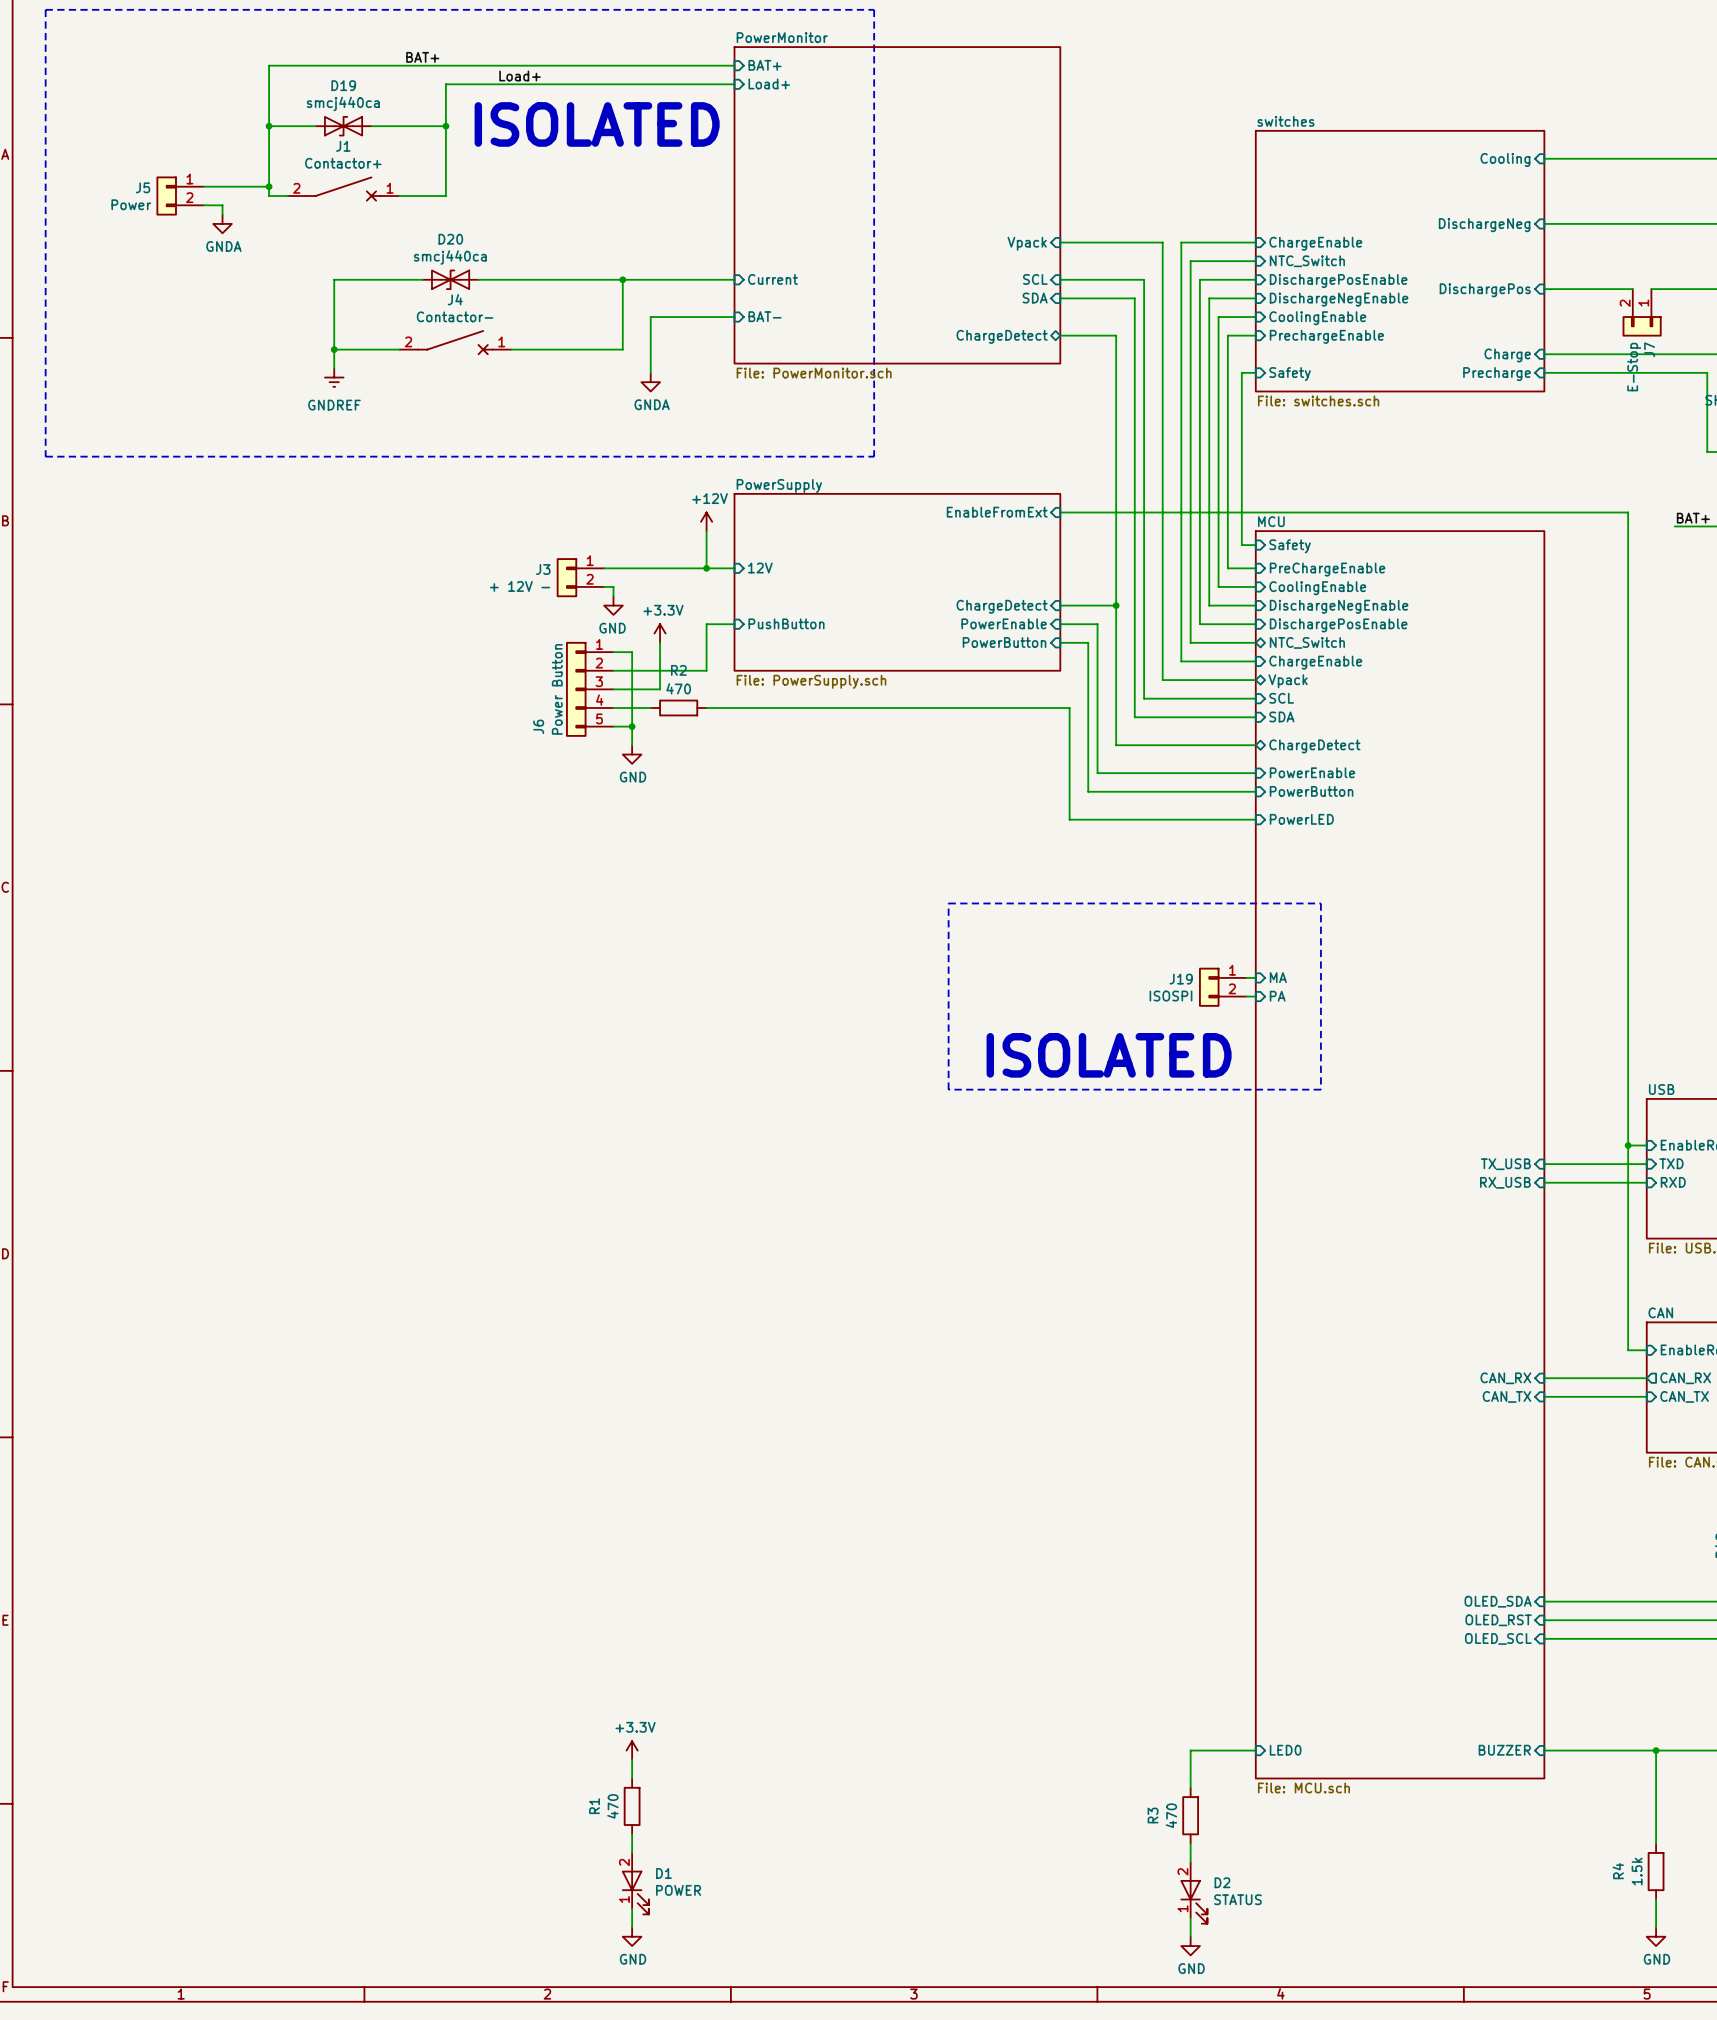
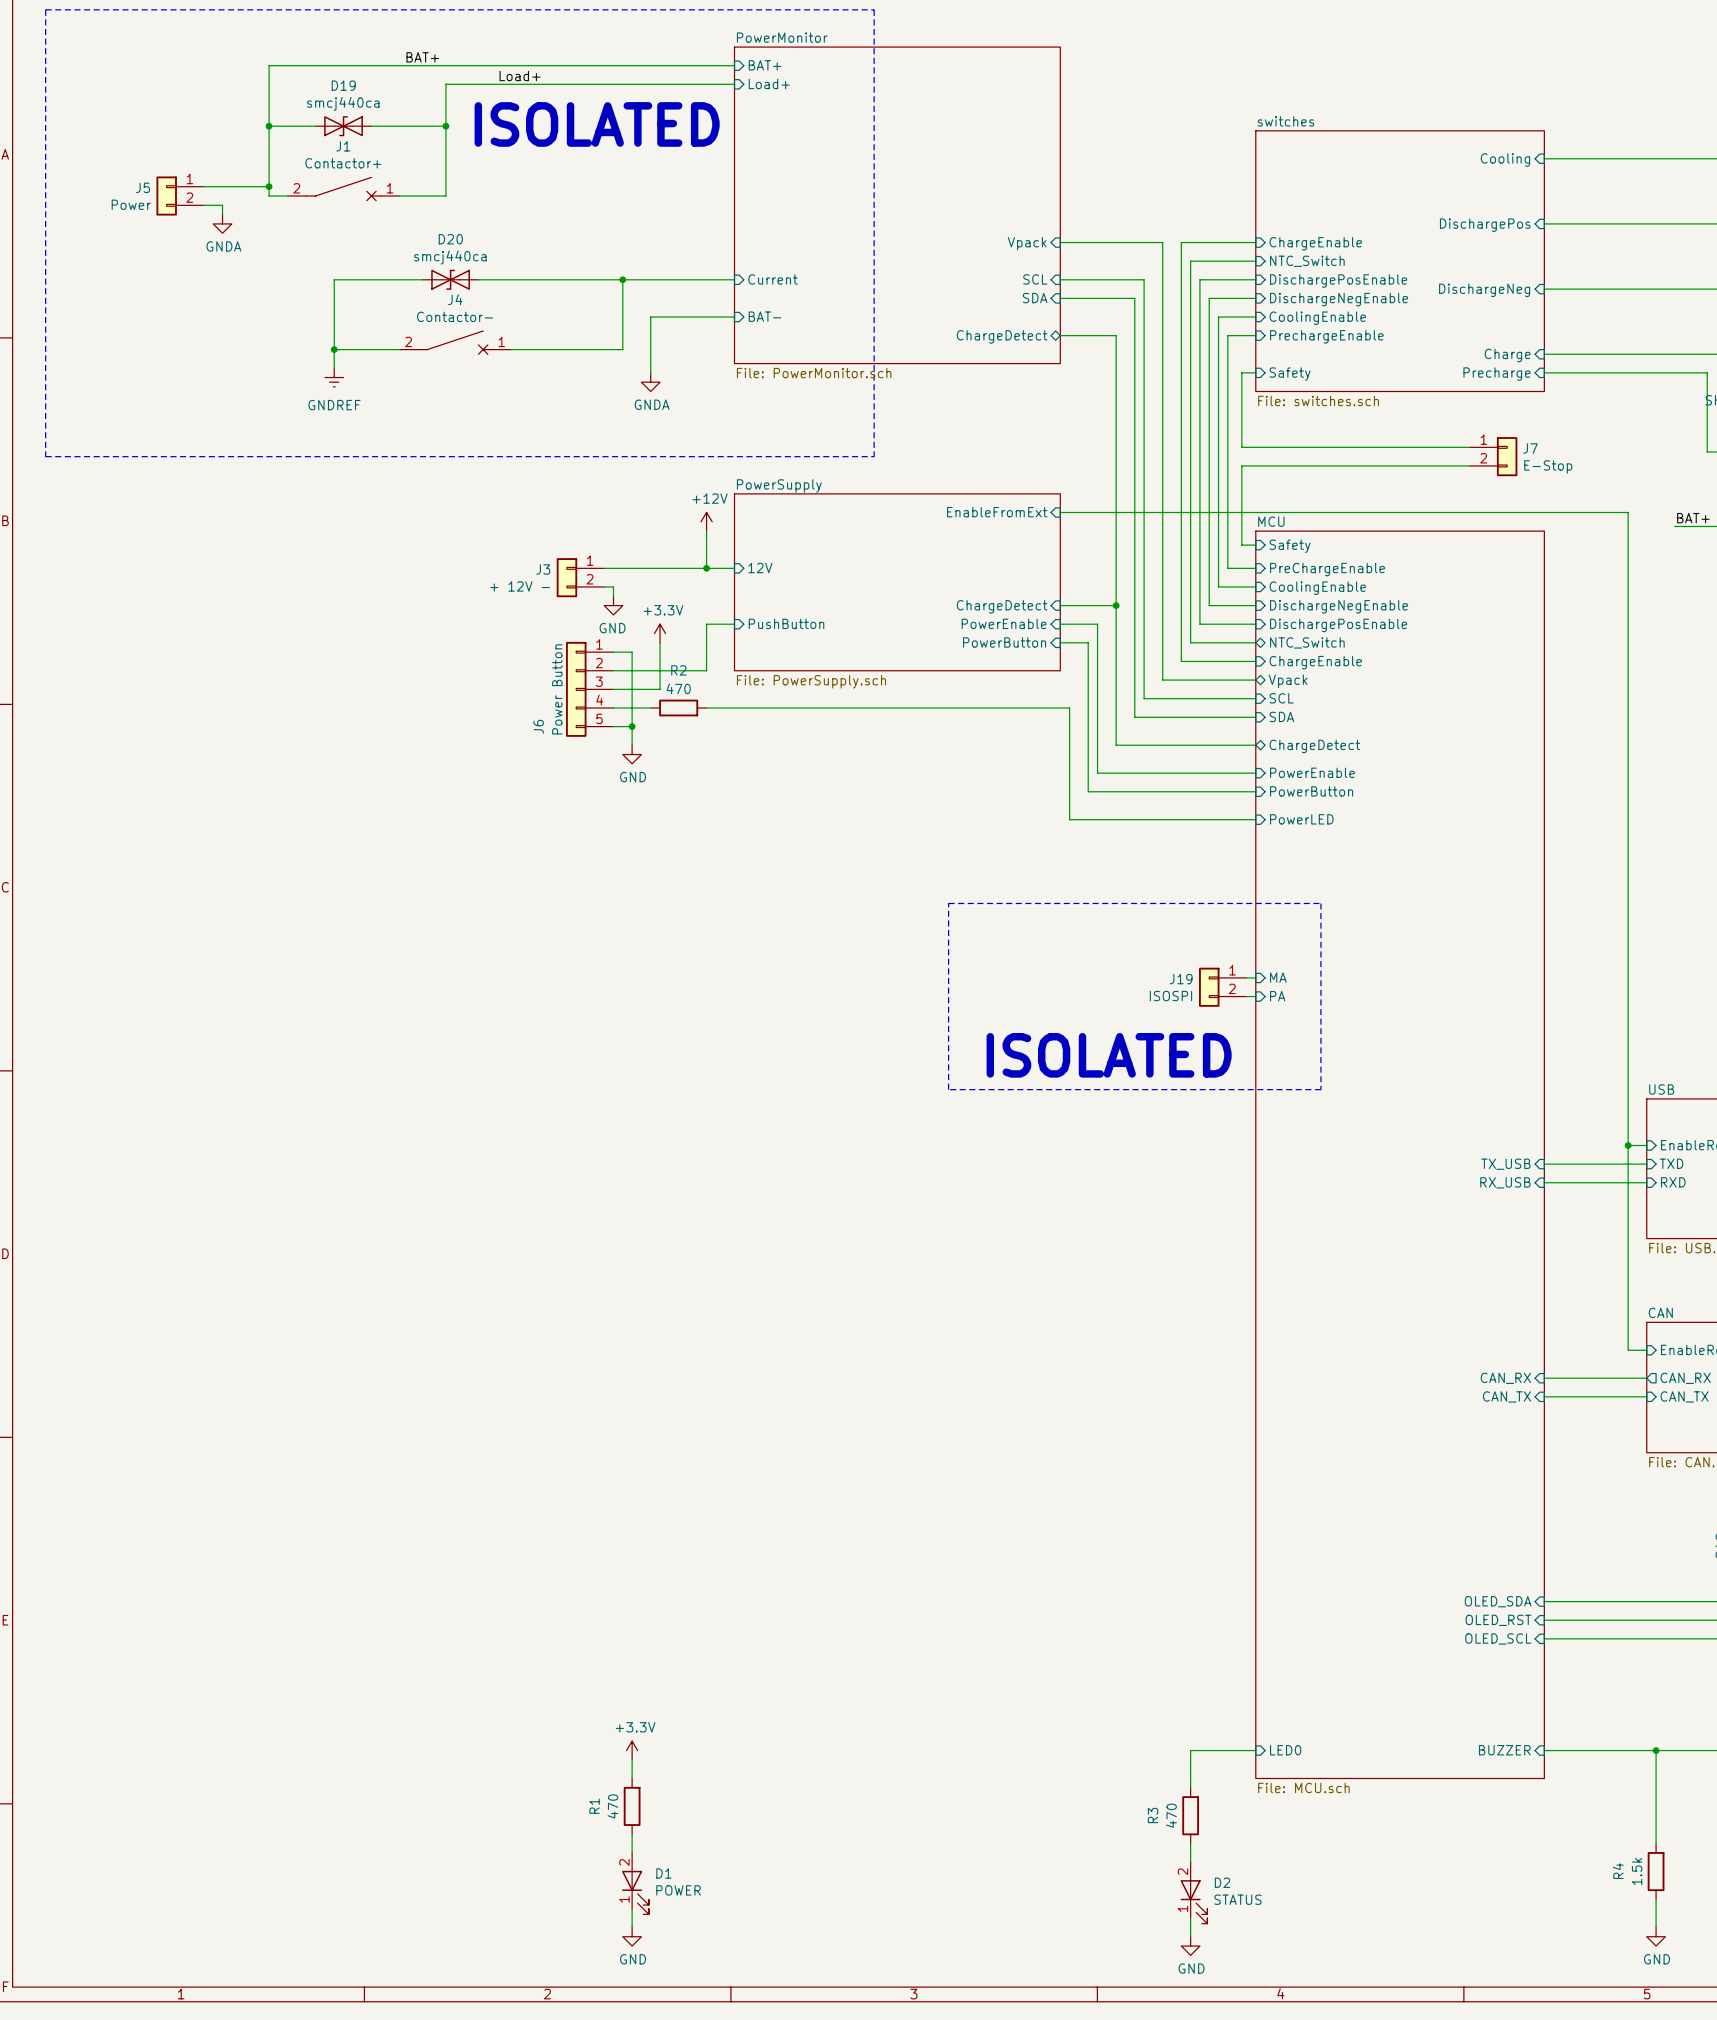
sheet pin: DischargeNeg (1484, 225) -> DischargePos (1485, 225)
wire: none -> (1632, 289) (1651, 289)
sheet pin: DischargePos (1485, 290) -> DischargeNeg (1484, 290)
J7 position: (1642, 312) -> (1493, 456)
J7 rotation: 0° (1642, 326) -> 90° counterclockwise (1507, 456)
wire: (1241, 447) (1241, 465) -> (1241, 447) (1469, 447)
wire: none -> (1241, 465) (1469, 465)

